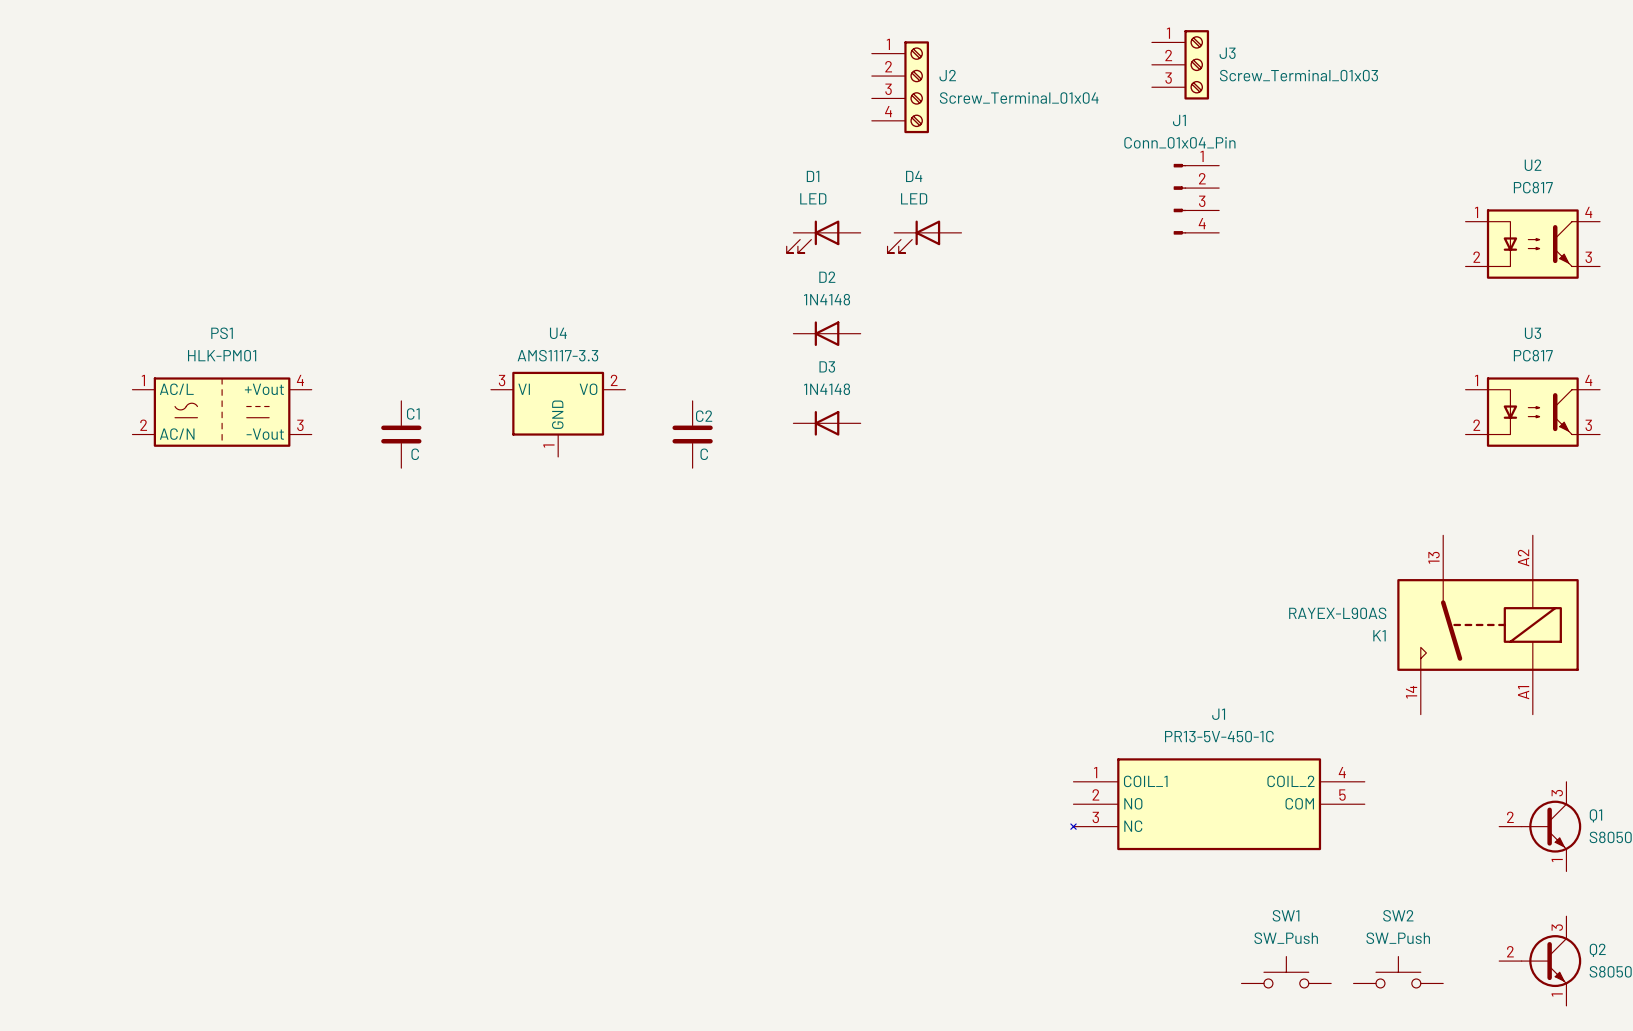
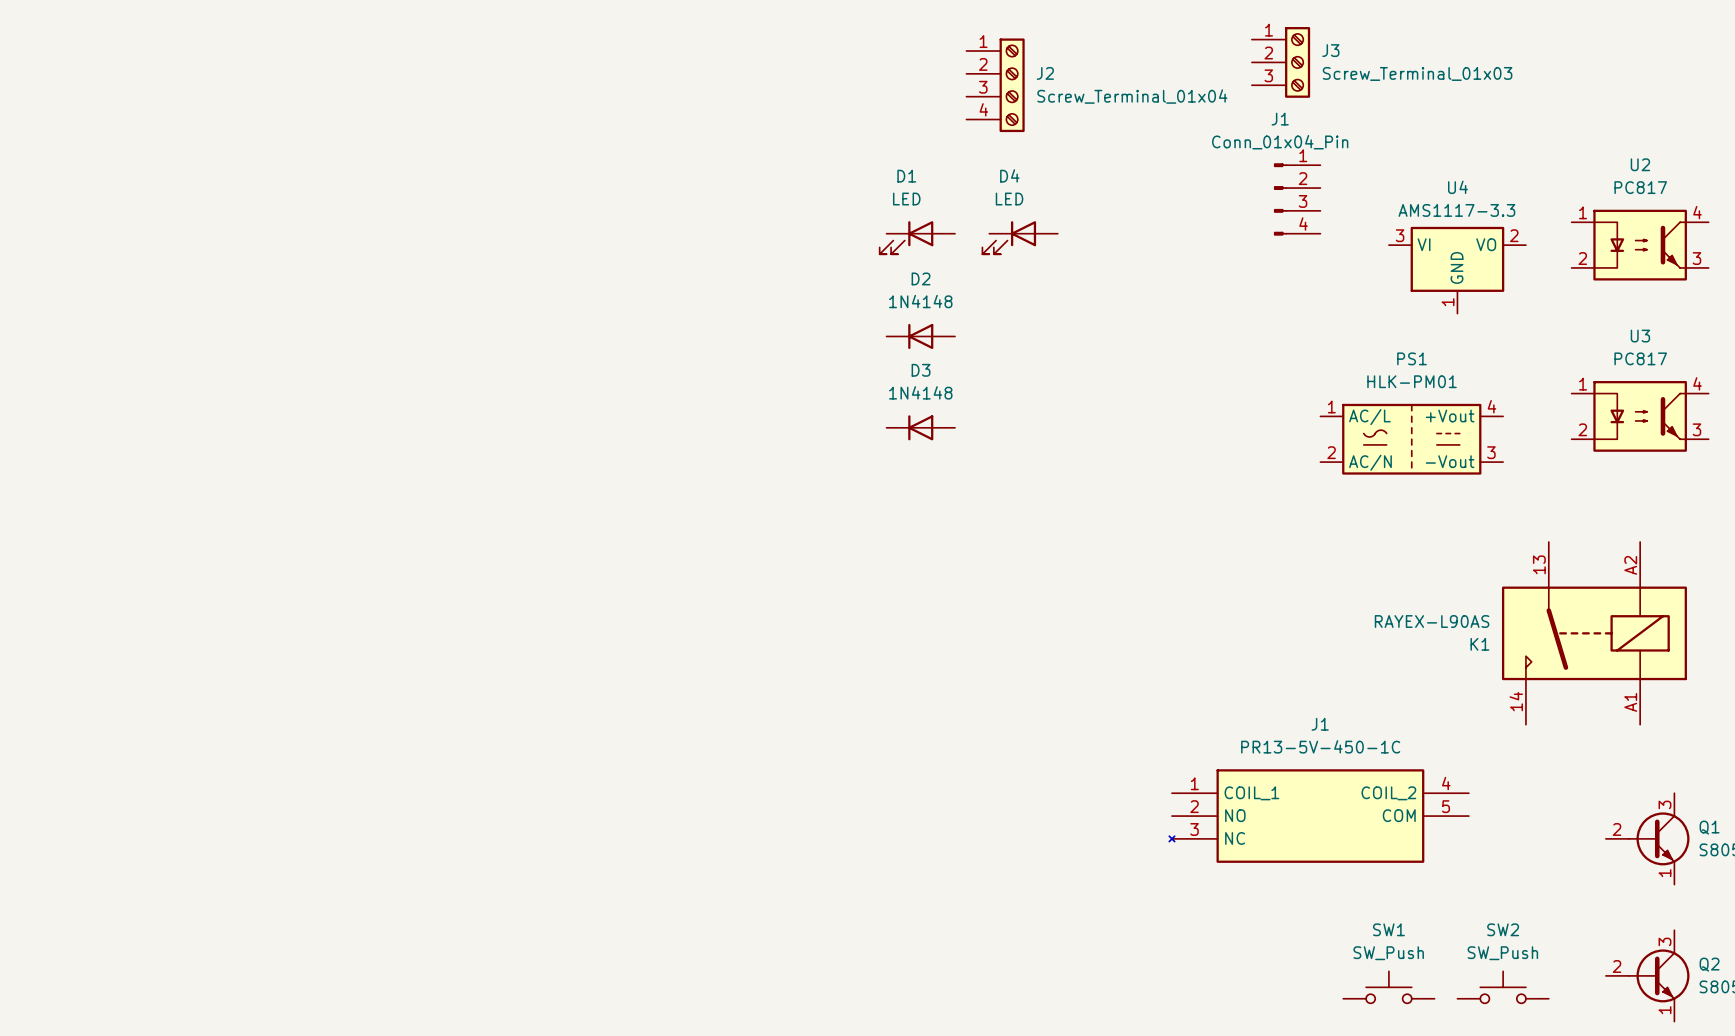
PS1 position: (222, 412) -> (1411, 439)
U4 position: (558, 414) -> (1457, 270)
C1: C (401, 434) -> none
C2: C (692, 434) -> none

